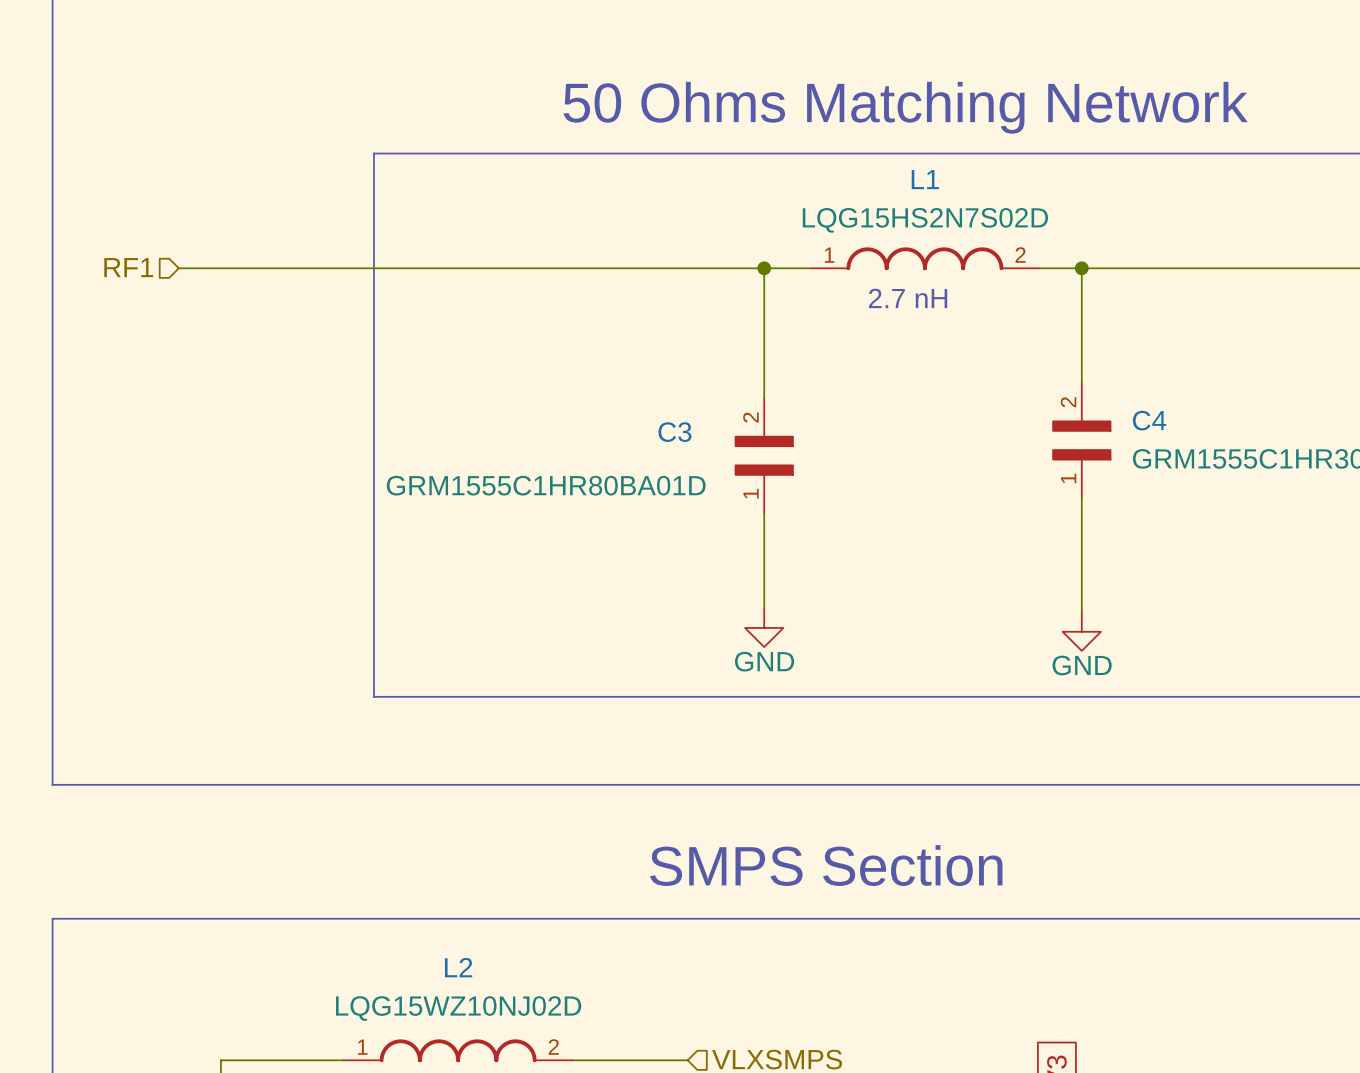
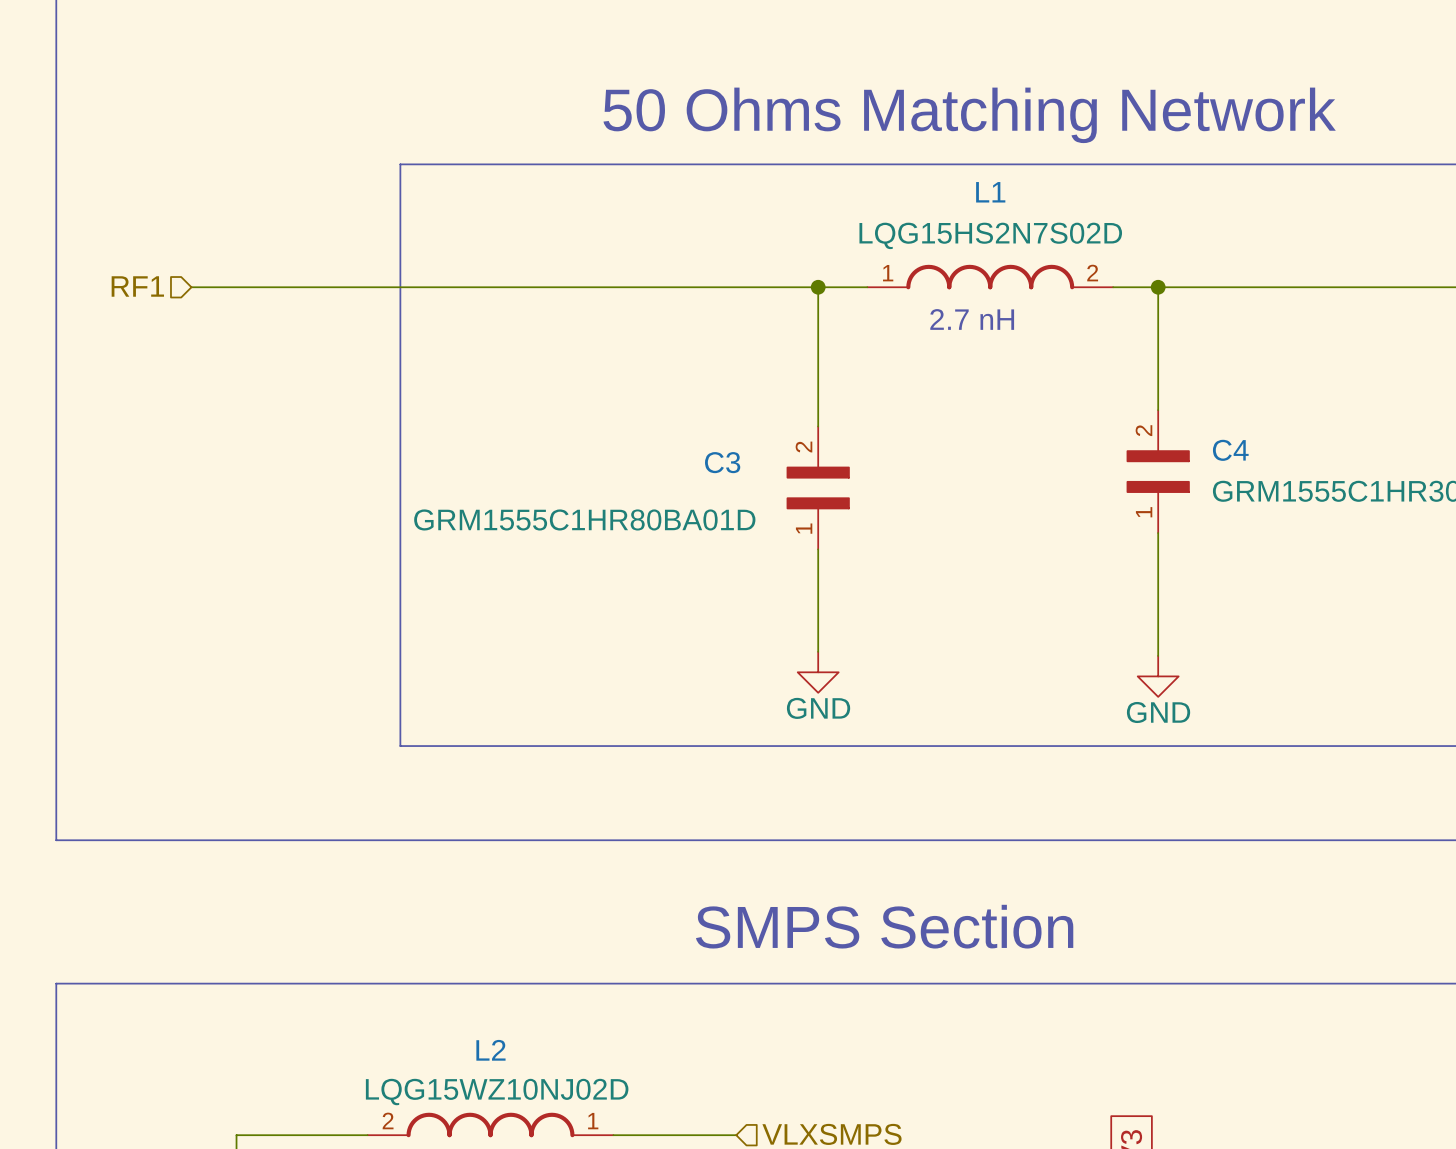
L2 flip: as is (458, 1050) -> left-right (490, 1124)

